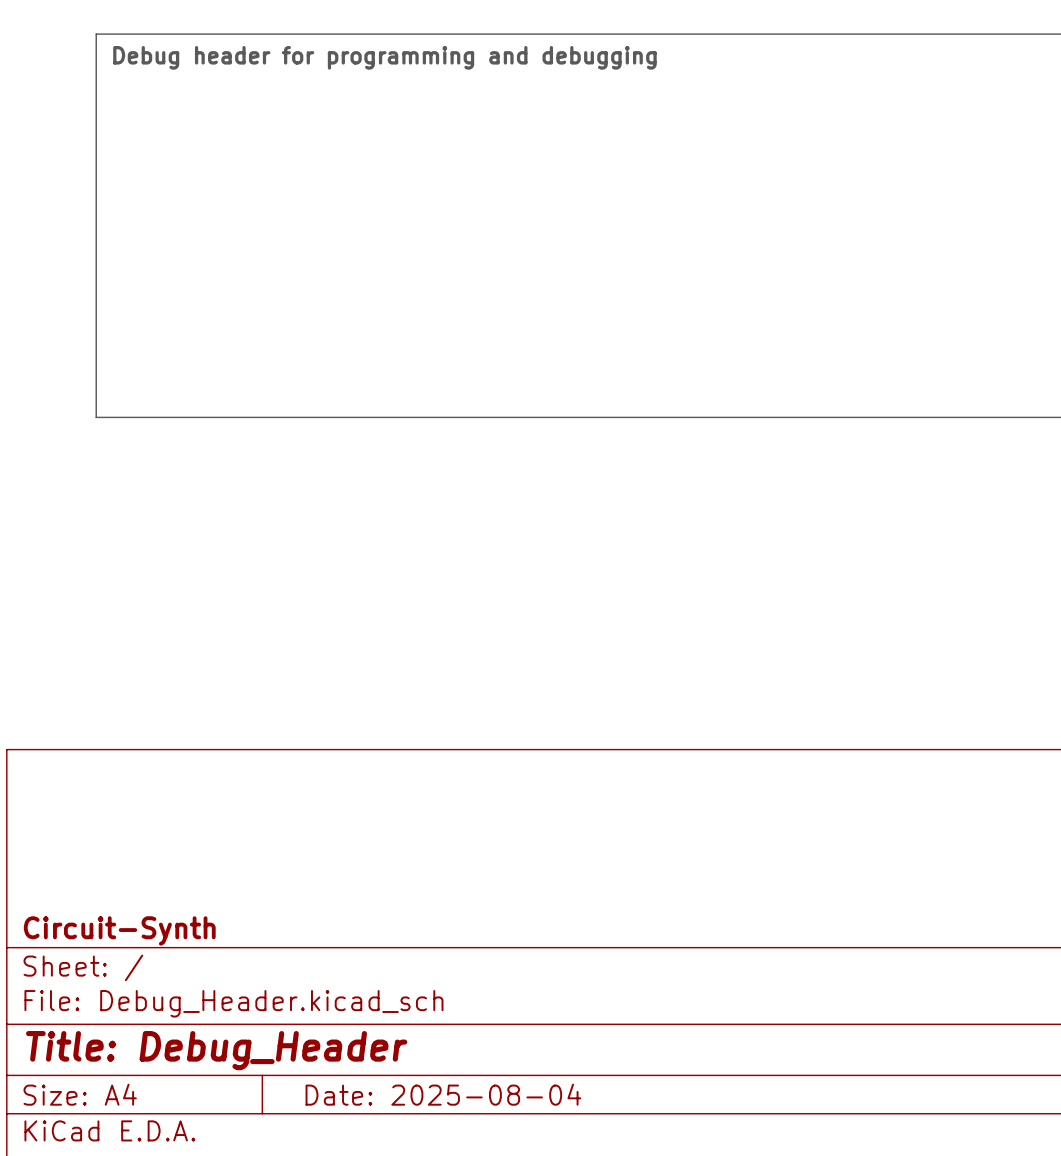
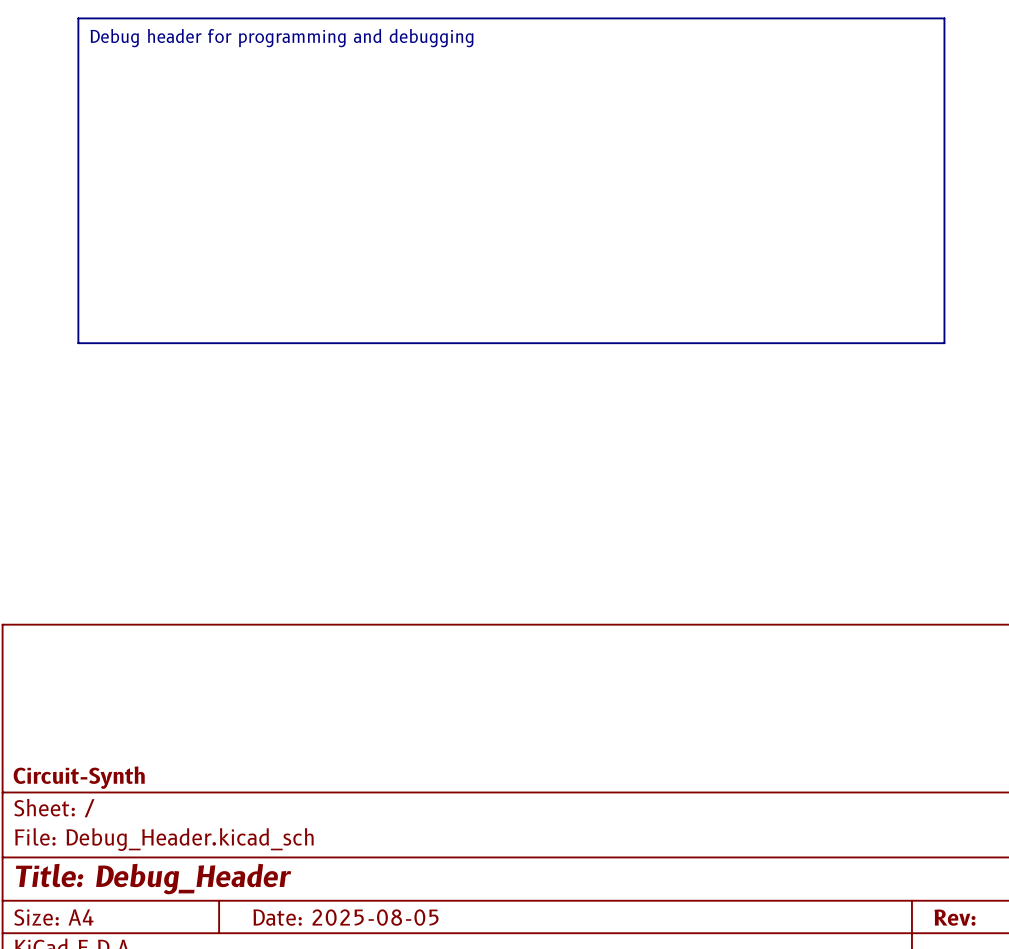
title block: Date: 2025-08-04 (443, 1094) -> Date: 2025-08-05 (345, 917)

